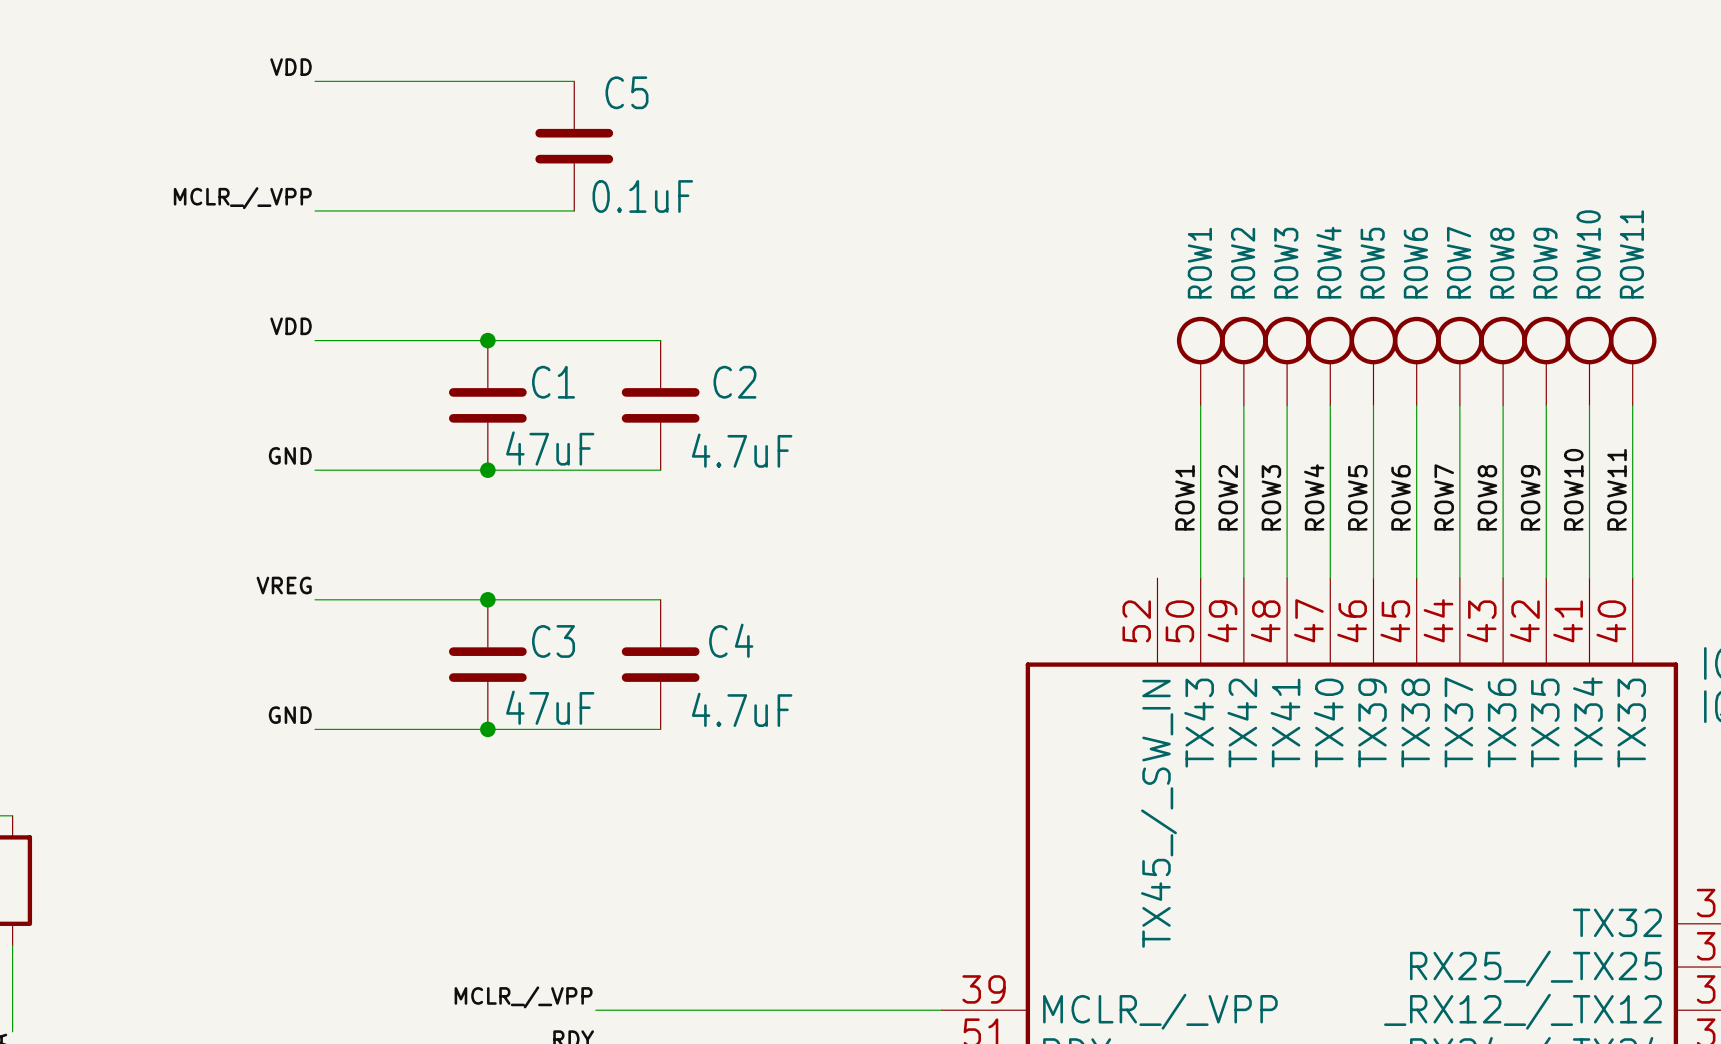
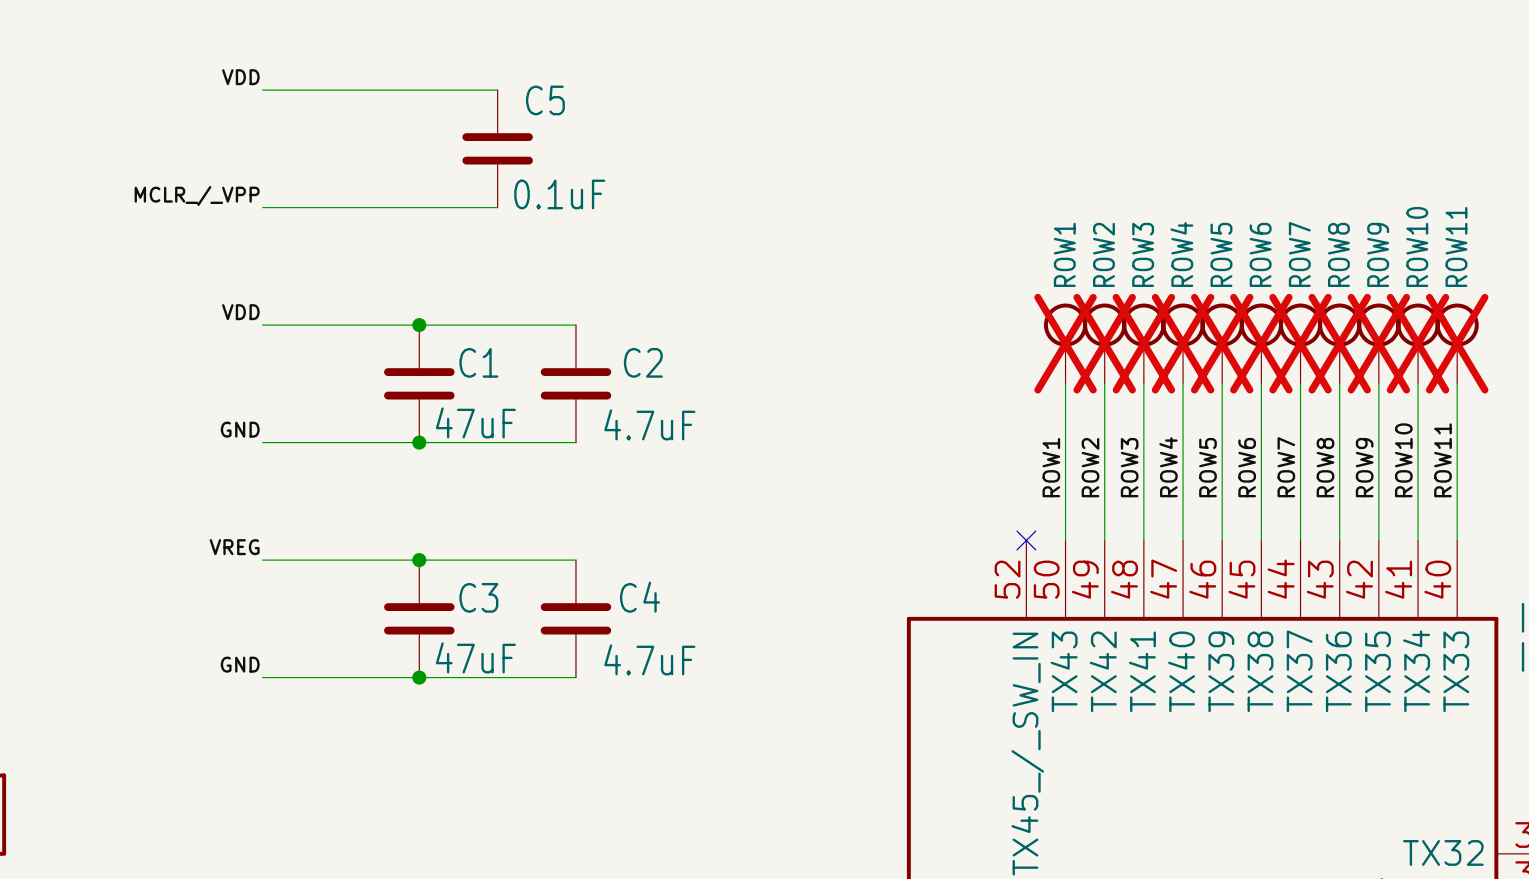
ROW1 do-not-place cross: none -> (1065, 343)
ROW2 do-not-place cross: none -> (1104, 343)
ROW3 do-not-place cross: none -> (1143, 343)
ROW4 do-not-place cross: none -> (1183, 343)
ROW5 do-not-place cross: none -> (1222, 343)
ROW6 do-not-place cross: none -> (1261, 343)
ROW7 do-not-place cross: none -> (1300, 343)
ROW8 do-not-place cross: none -> (1339, 343)
ROW9 do-not-place cross: none -> (1378, 343)
ROW10 do-not-place cross: none -> (1418, 343)
ROW11 do-not-place cross: none -> (1457, 343)
no-connect mark: none -> (1026, 540)

